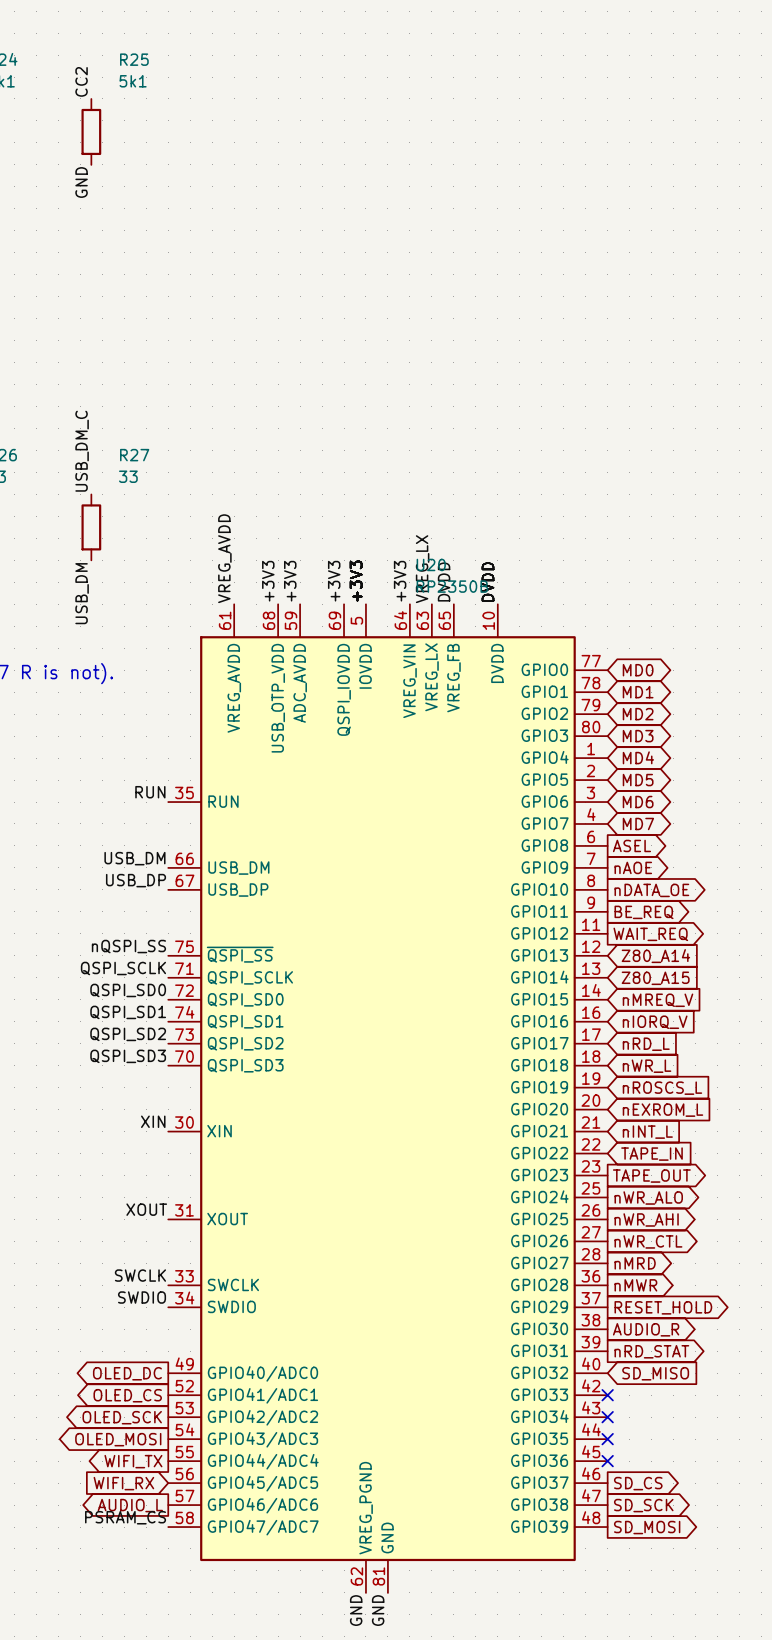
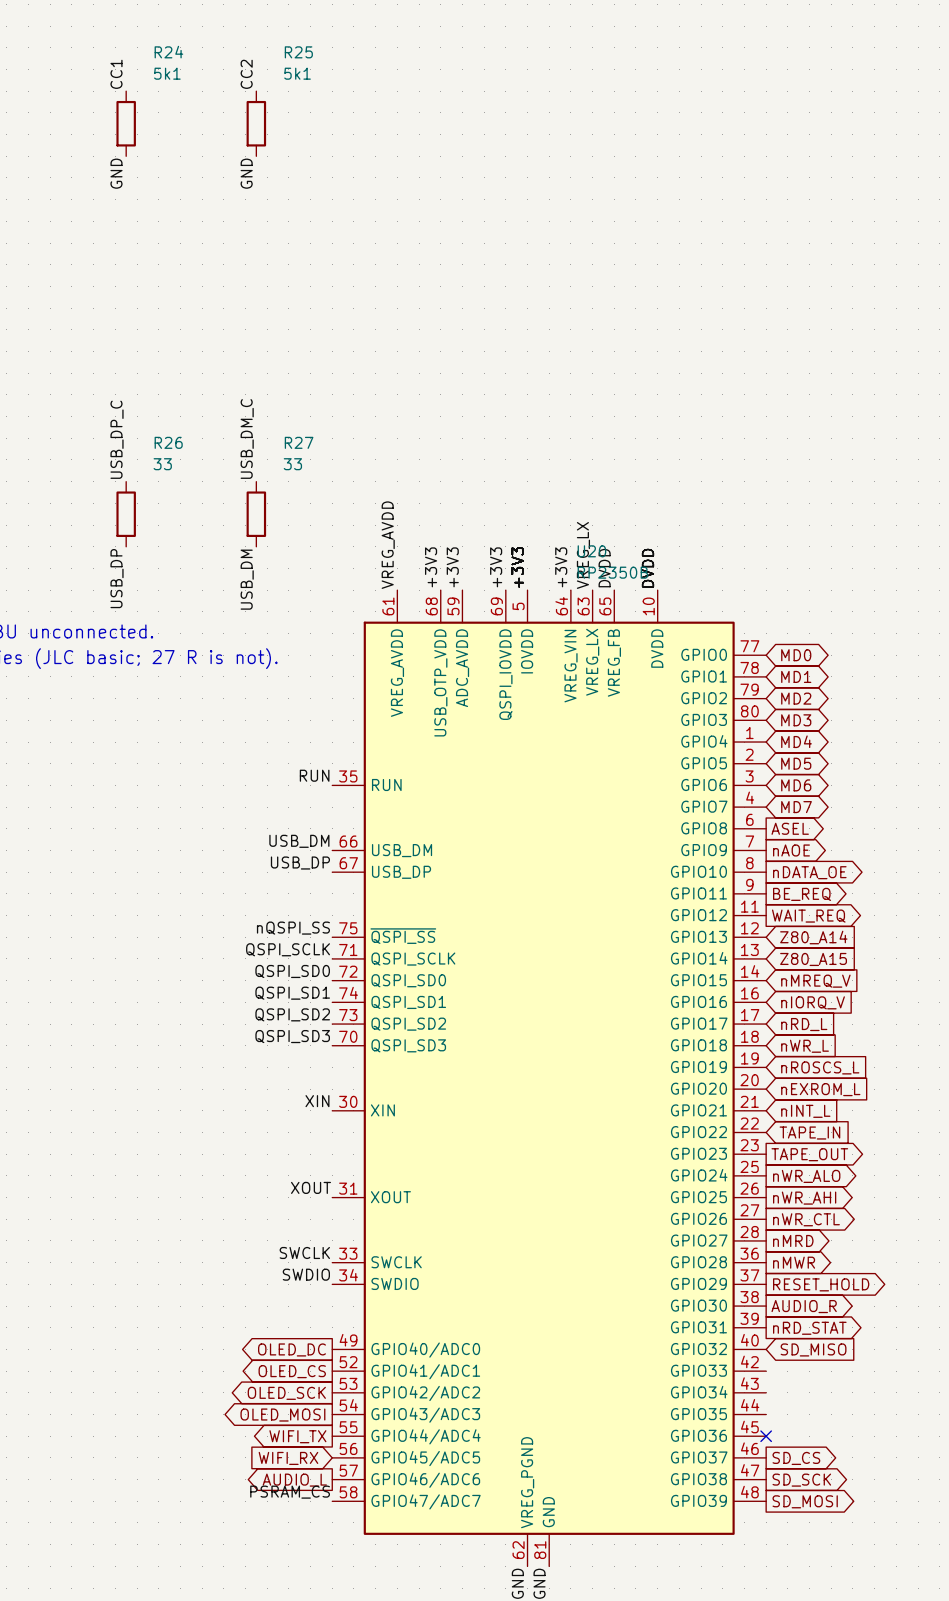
no-connect mark: (607, 1395) -> none
no-connect mark: (607, 1417) -> none
no-connect mark: (607, 1439) -> none

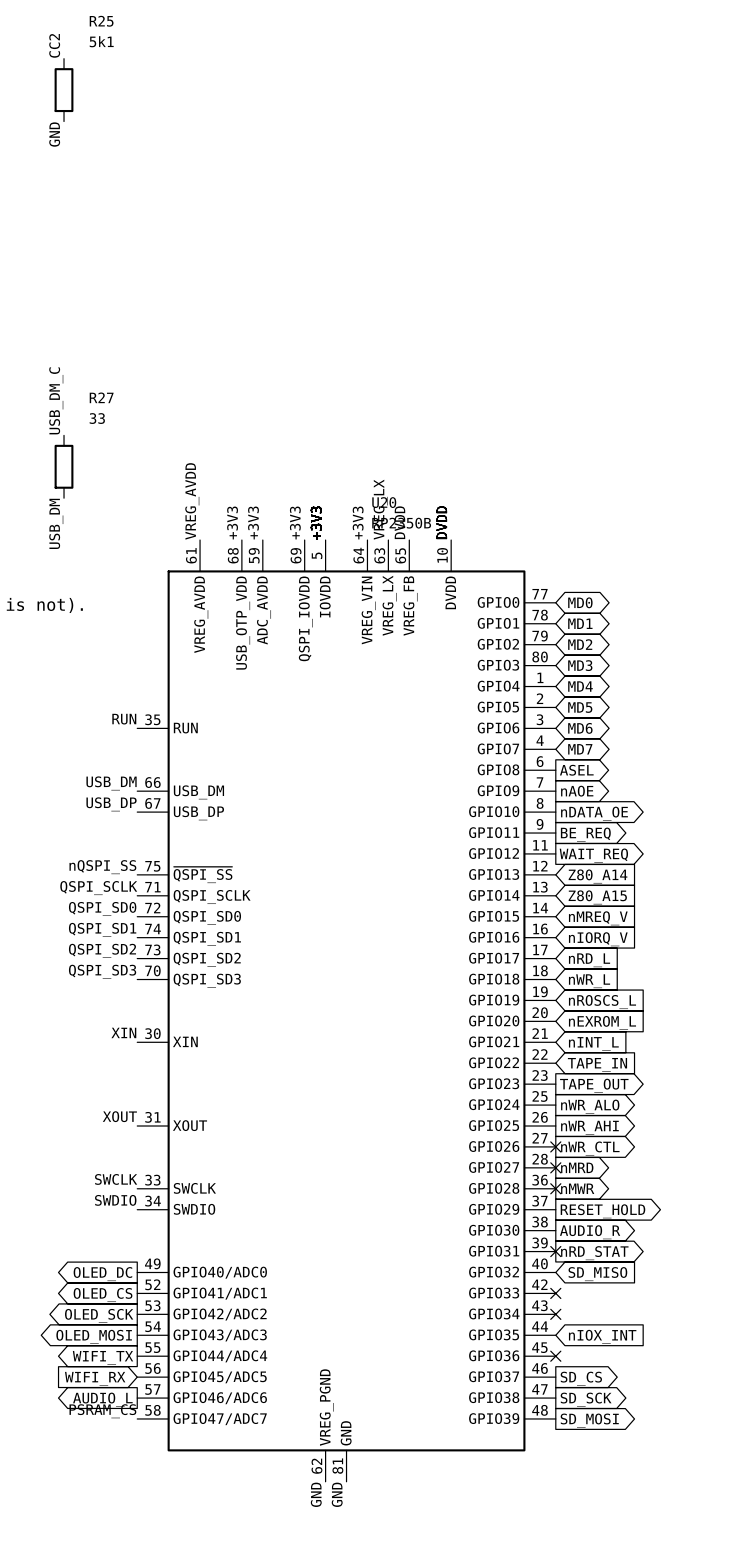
no-connect mark: none -> (555, 1146)
no-connect mark: none -> (555, 1167)
no-connect mark: none -> (555, 1188)
no-connect mark: none -> (555, 1251)
no-connect mark: none -> (555, 1293)
no-connect mark: none -> (555, 1314)
global label: none -> nIOX_INT (602, 1336)

